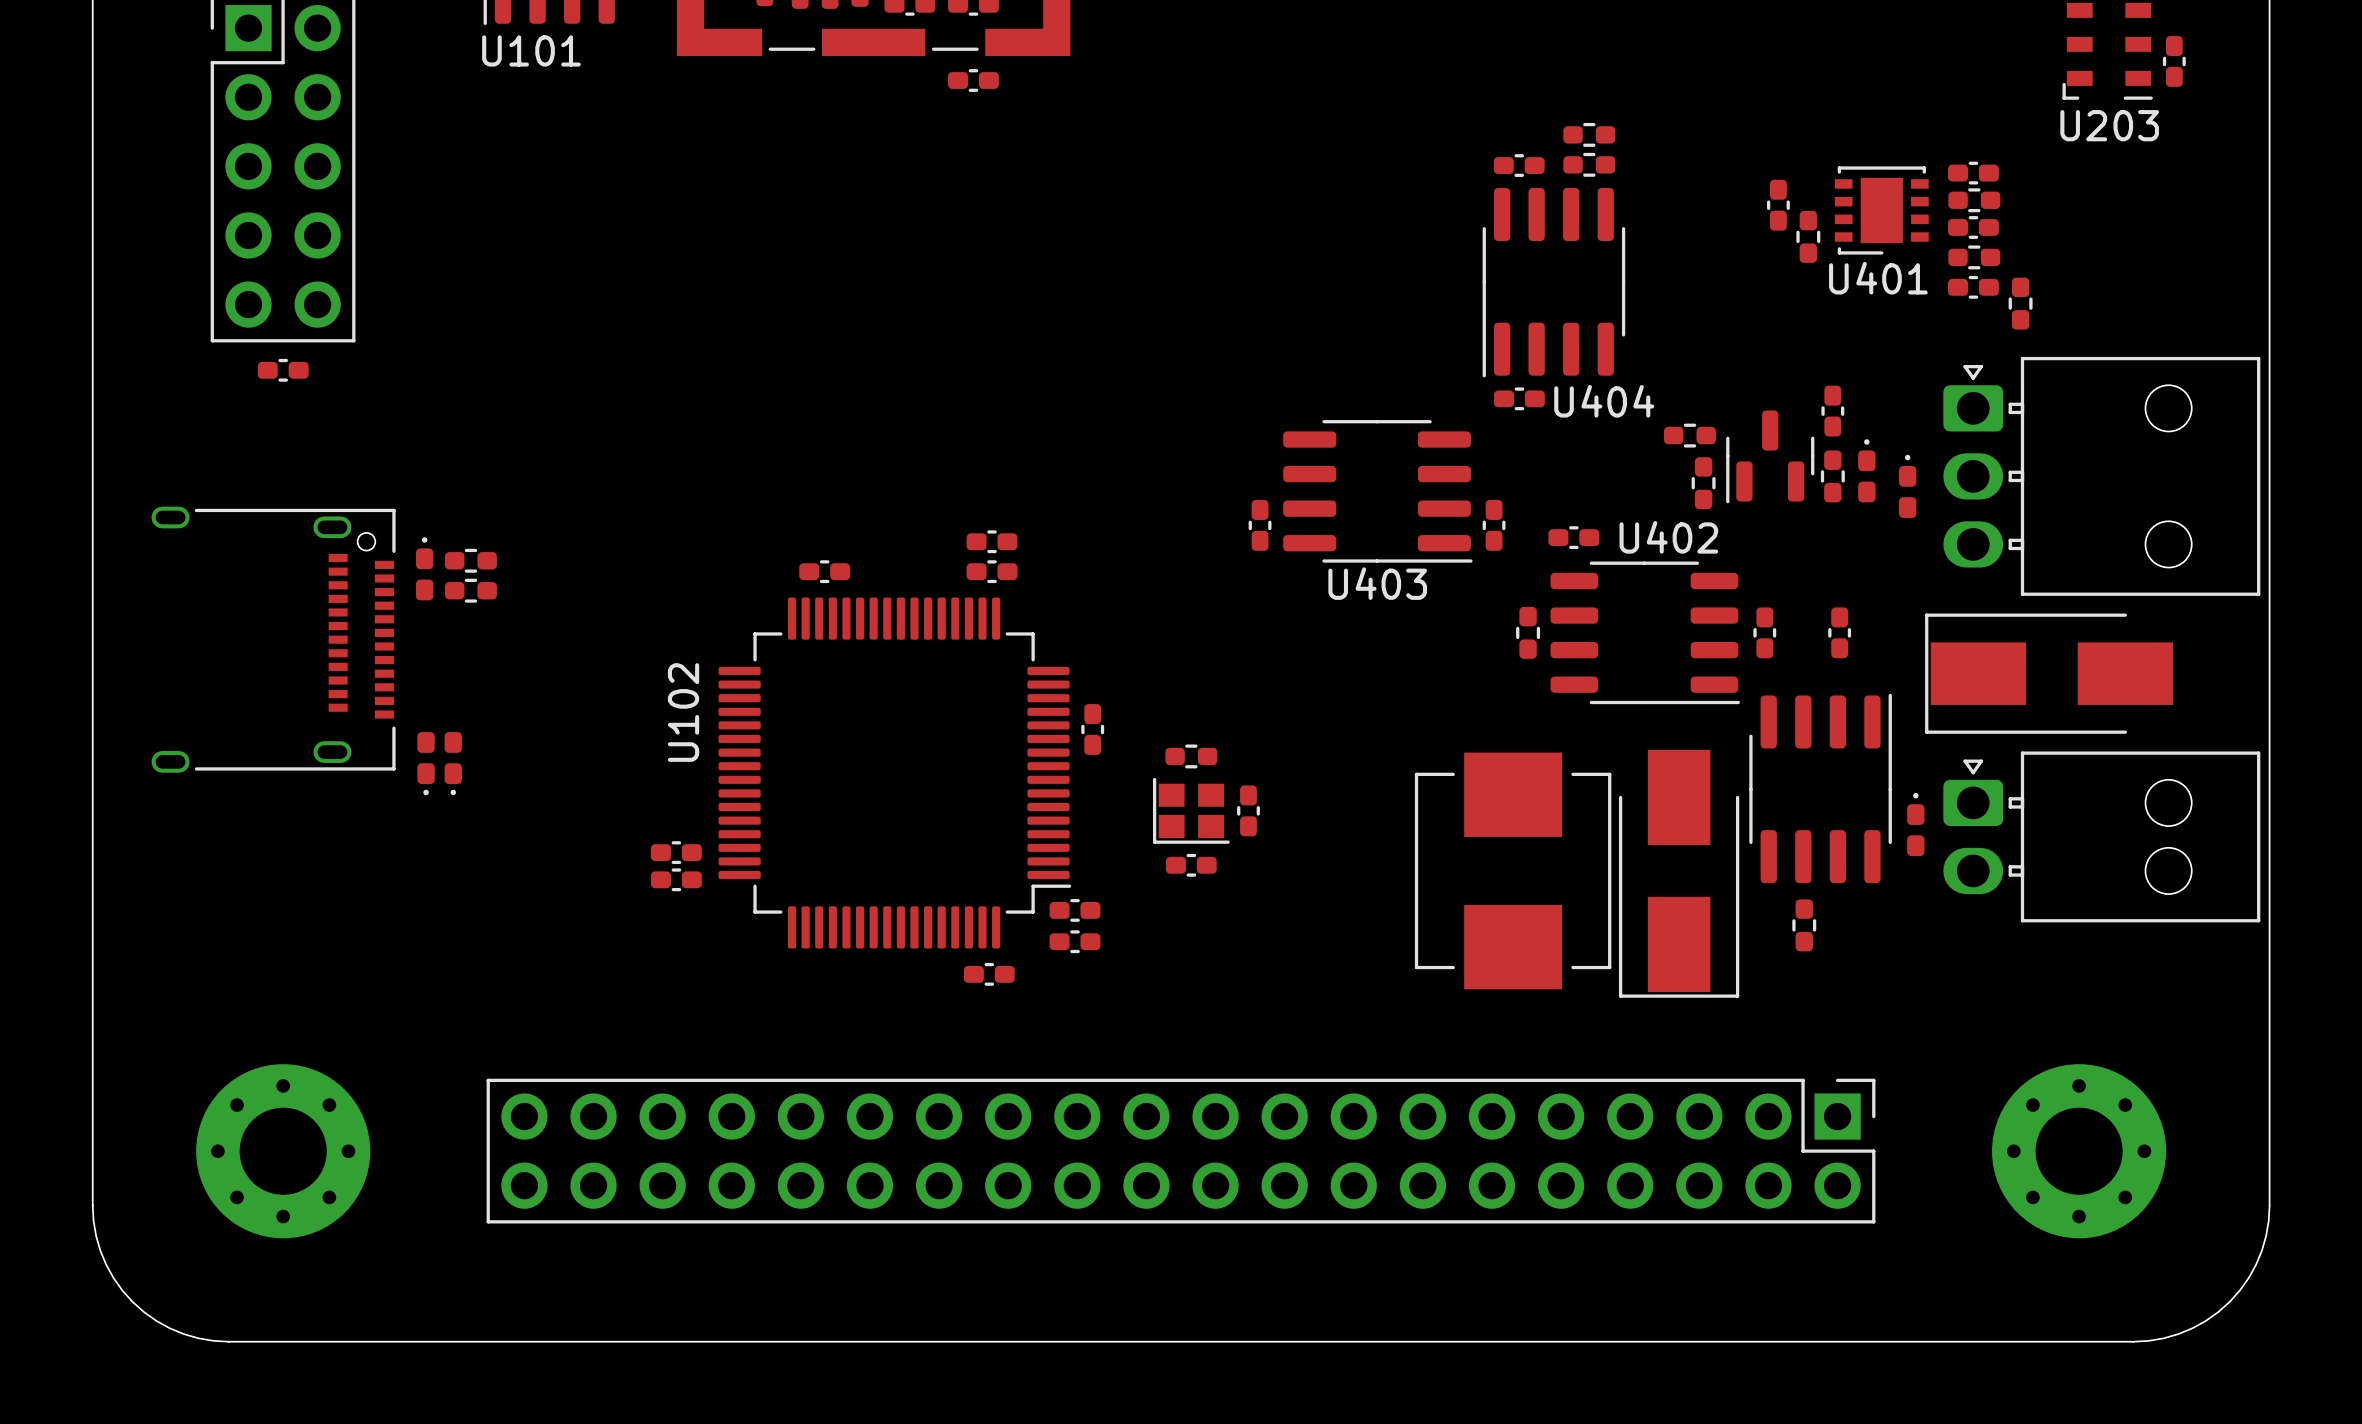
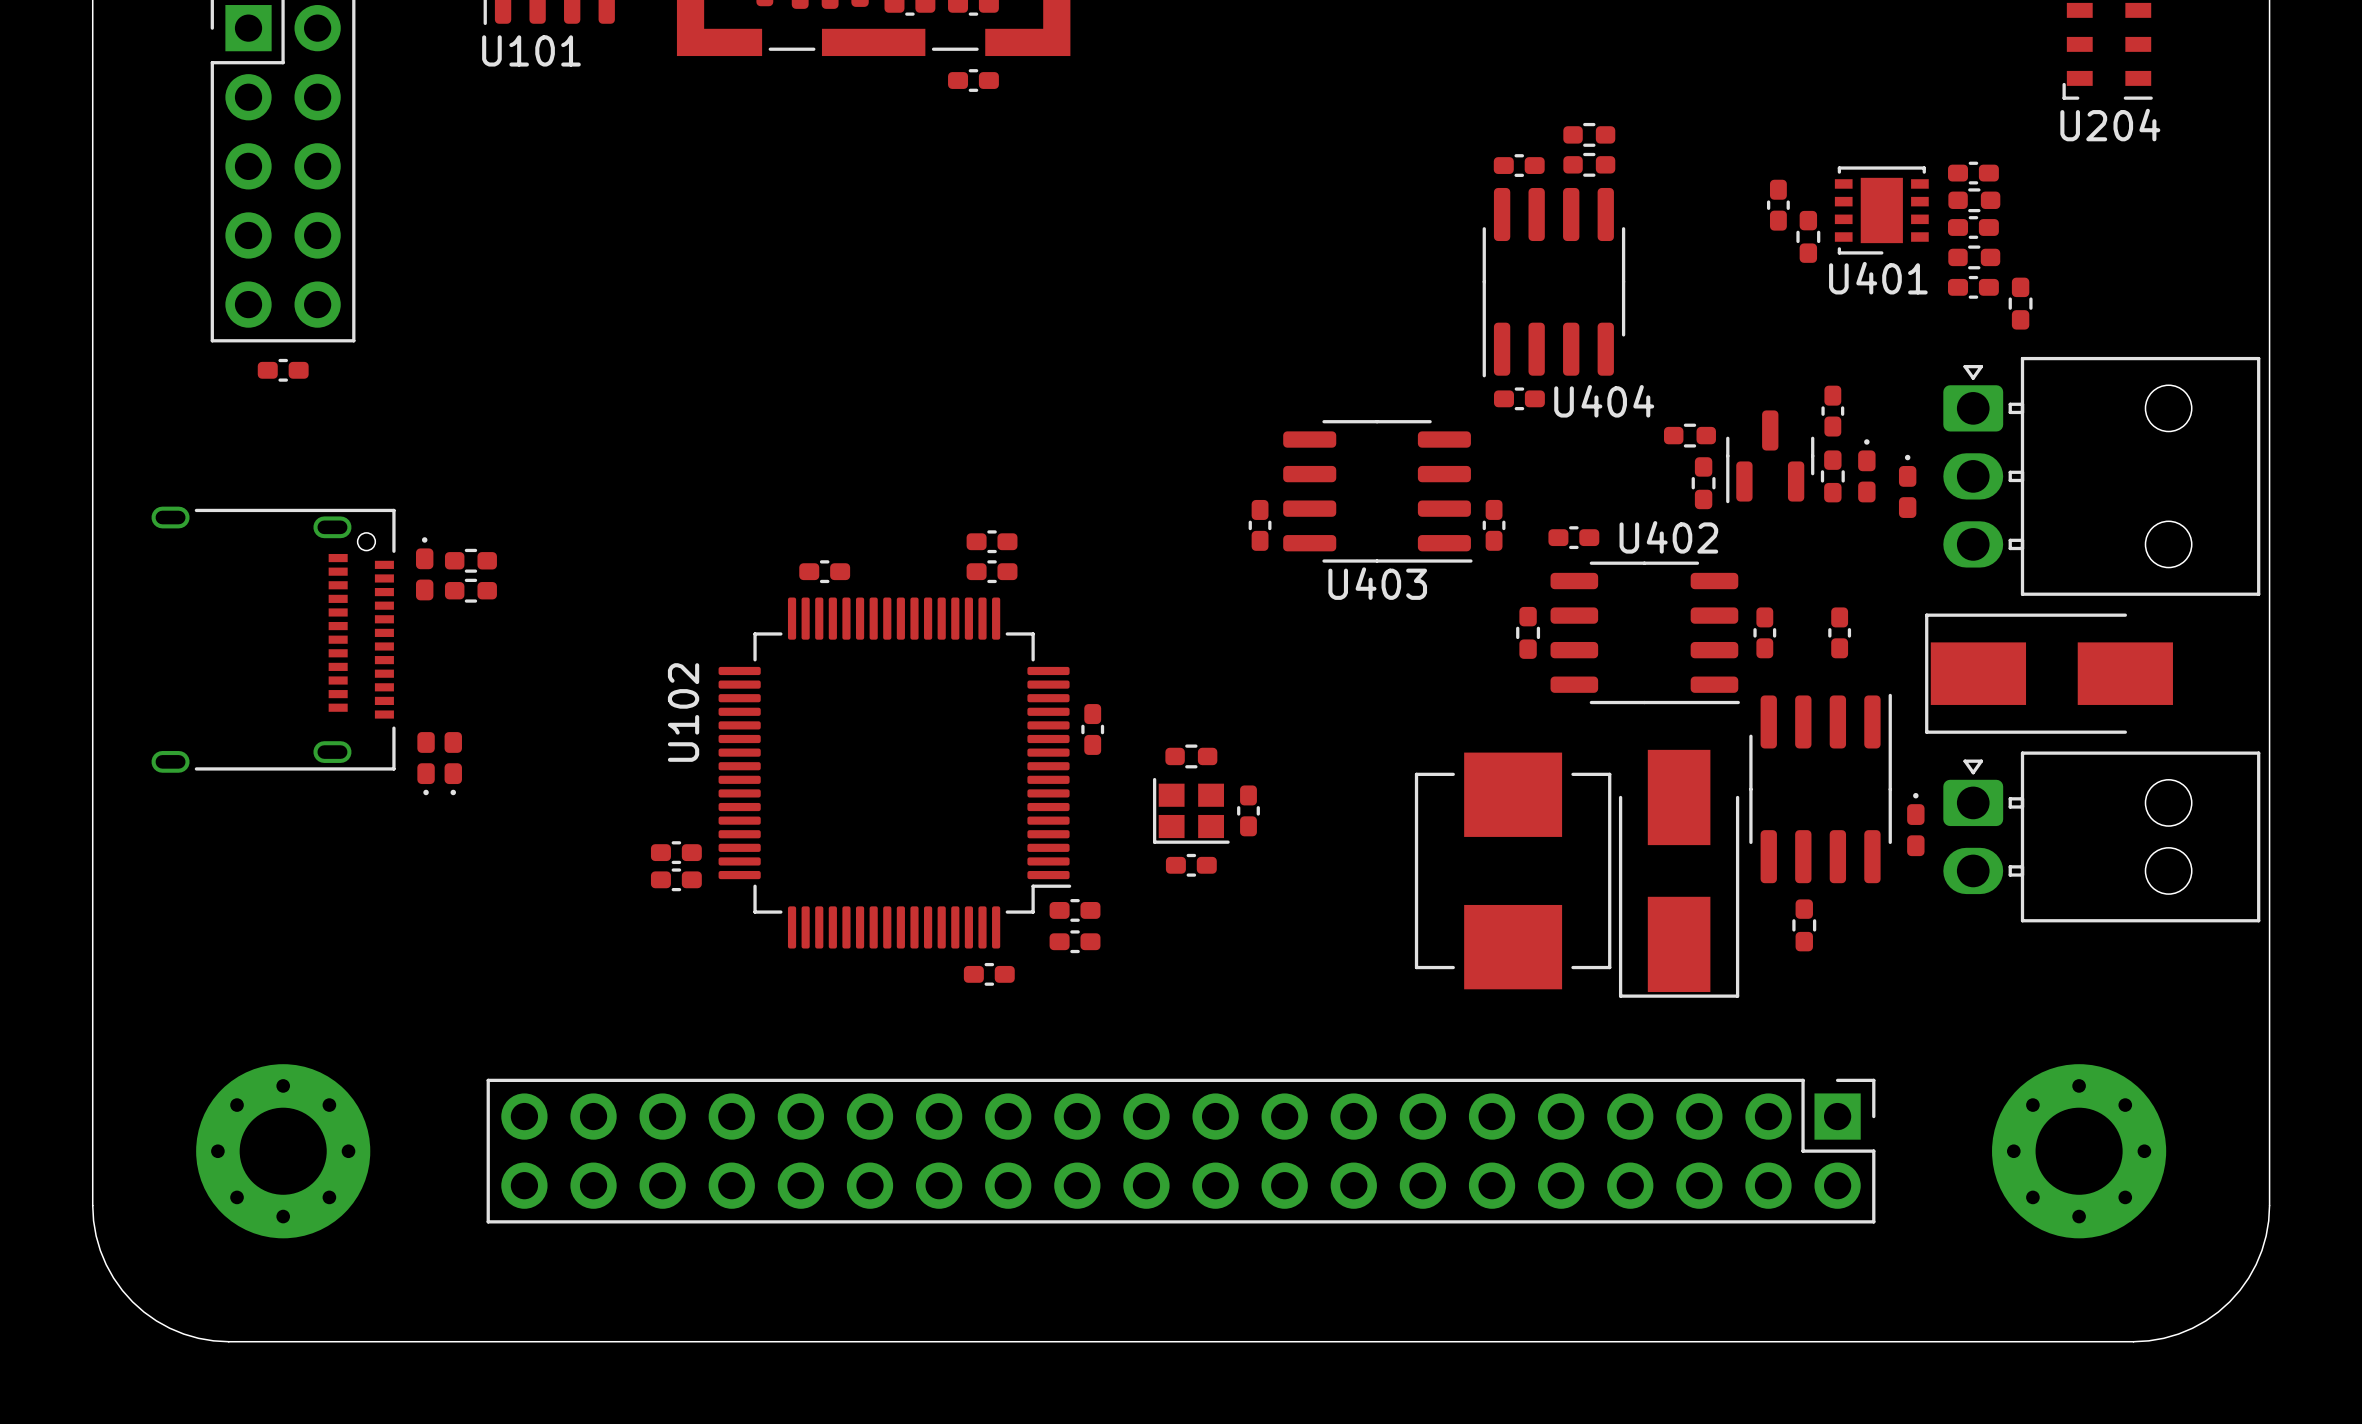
part: (2174, 61) -> none
U203 name: U203 (2109, 125) -> U204 (2110, 125)

